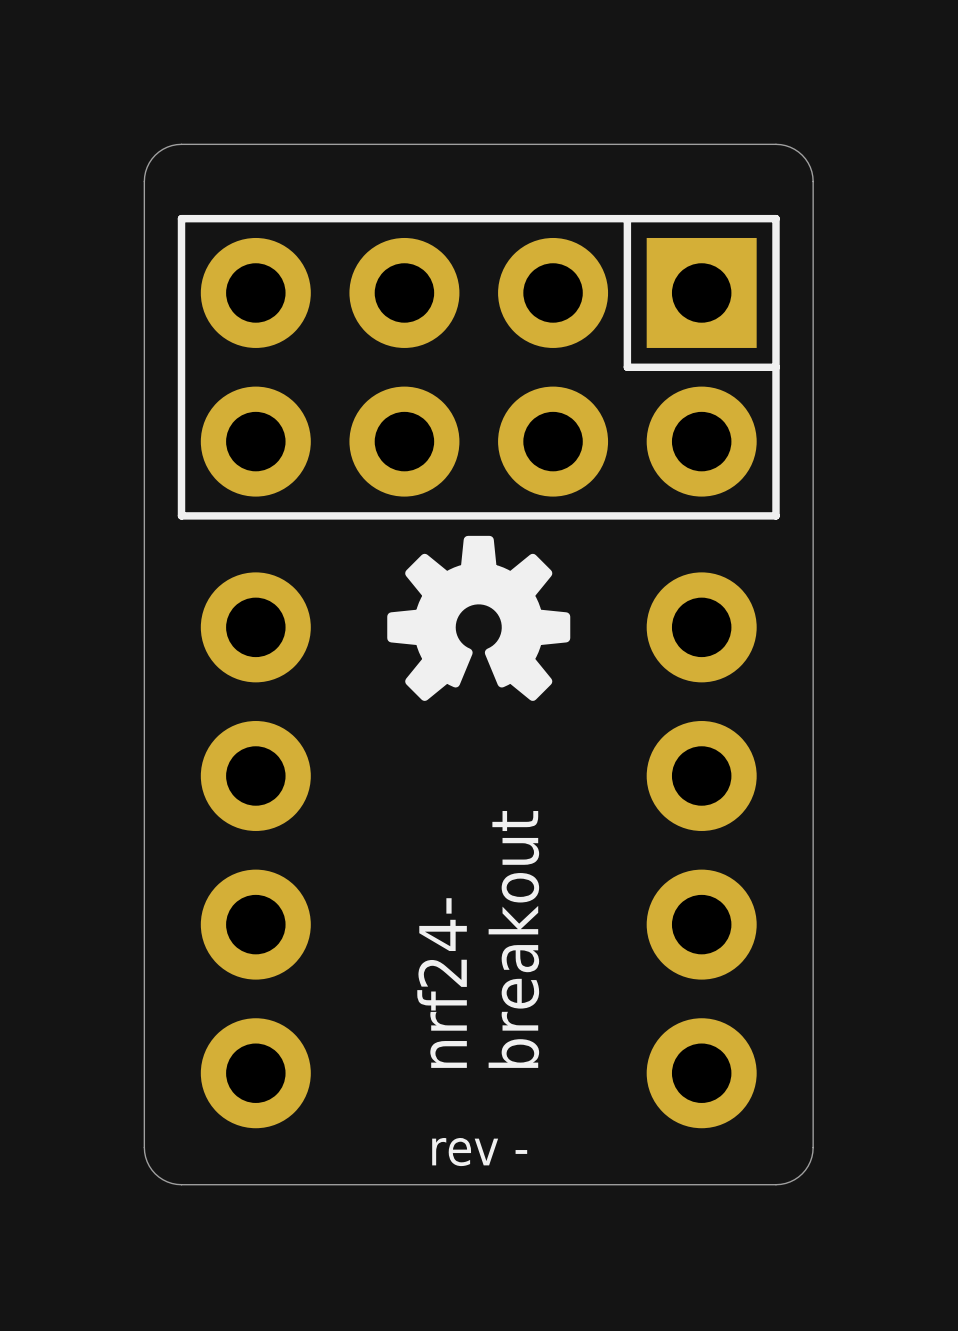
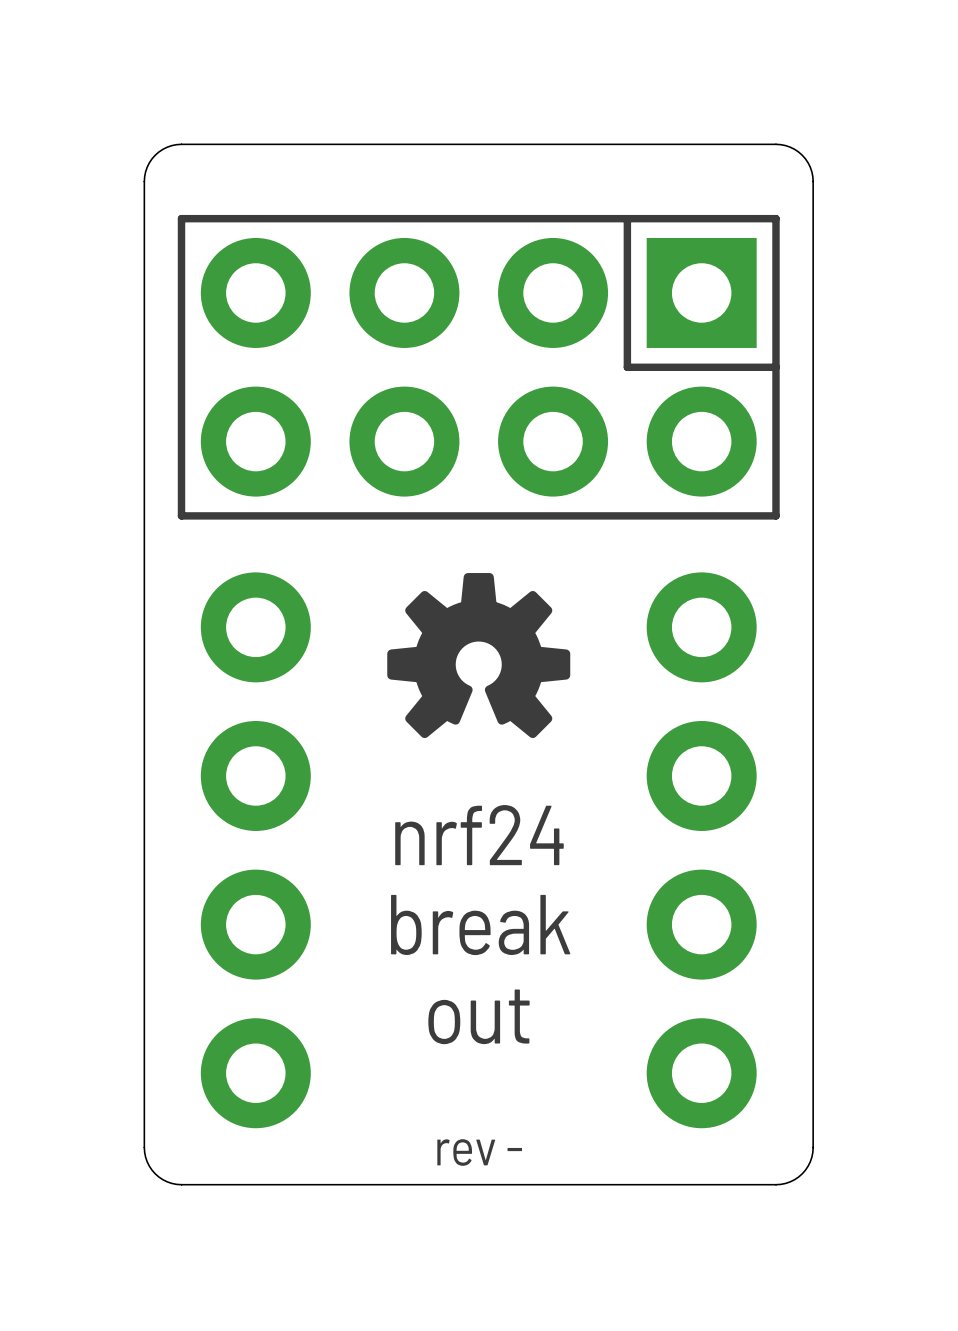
drawing position: (478, 618) -> (478, 655)
text: breakout (513, 939) -> break (480, 925)
text: nrf24- (442, 983) -> nrf24 (479, 835)
text: none -> out (478, 1016)

